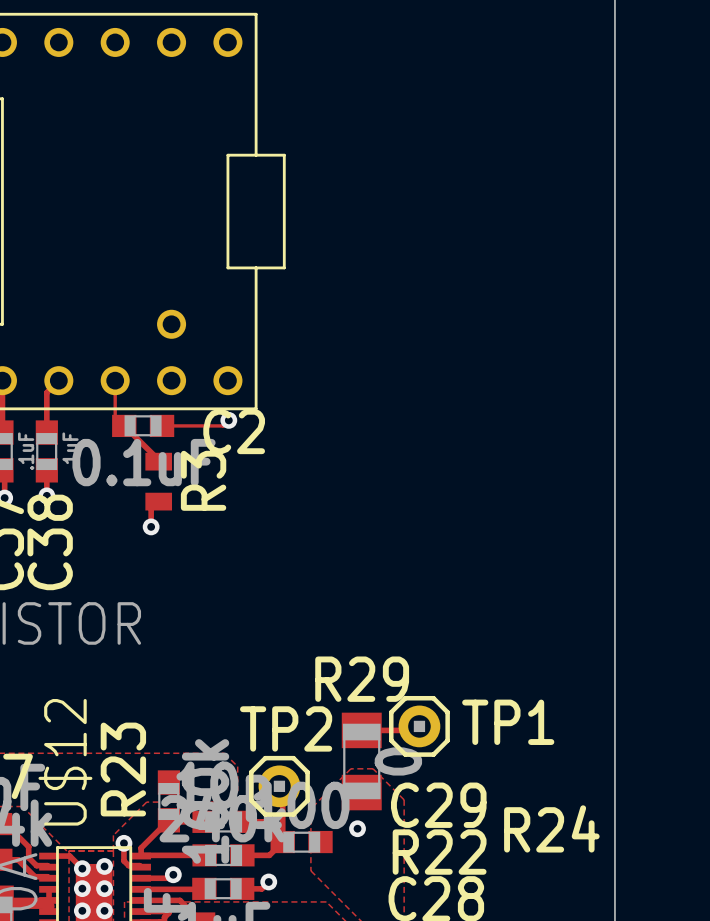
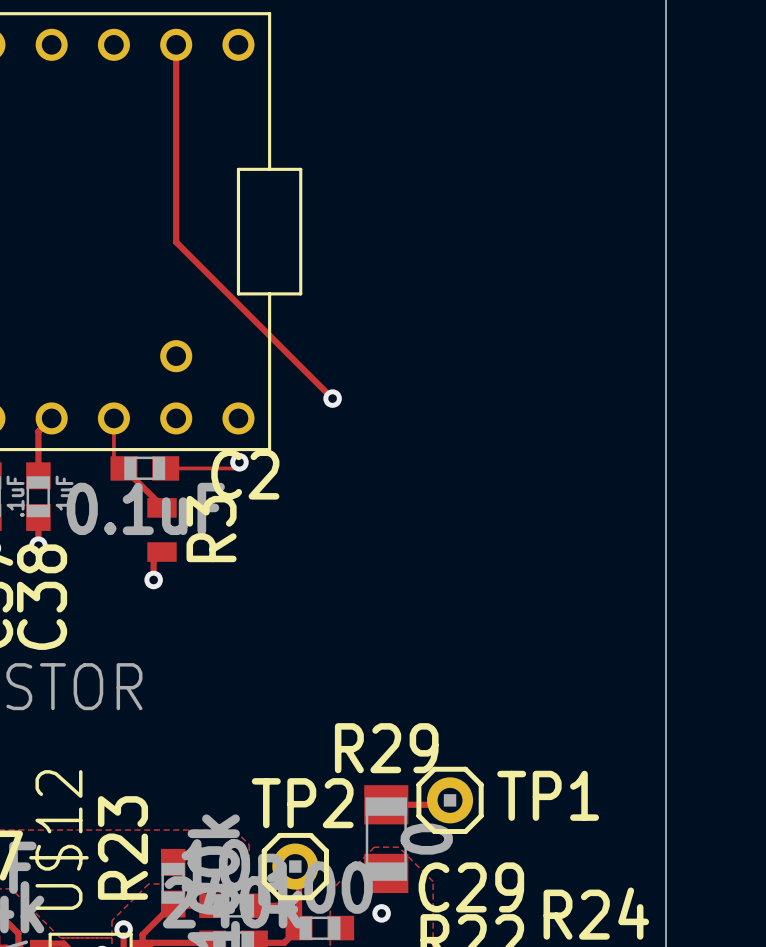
track: none -> (176, 44) (176, 242) (332, 398)
via: none -> (332, 398)

